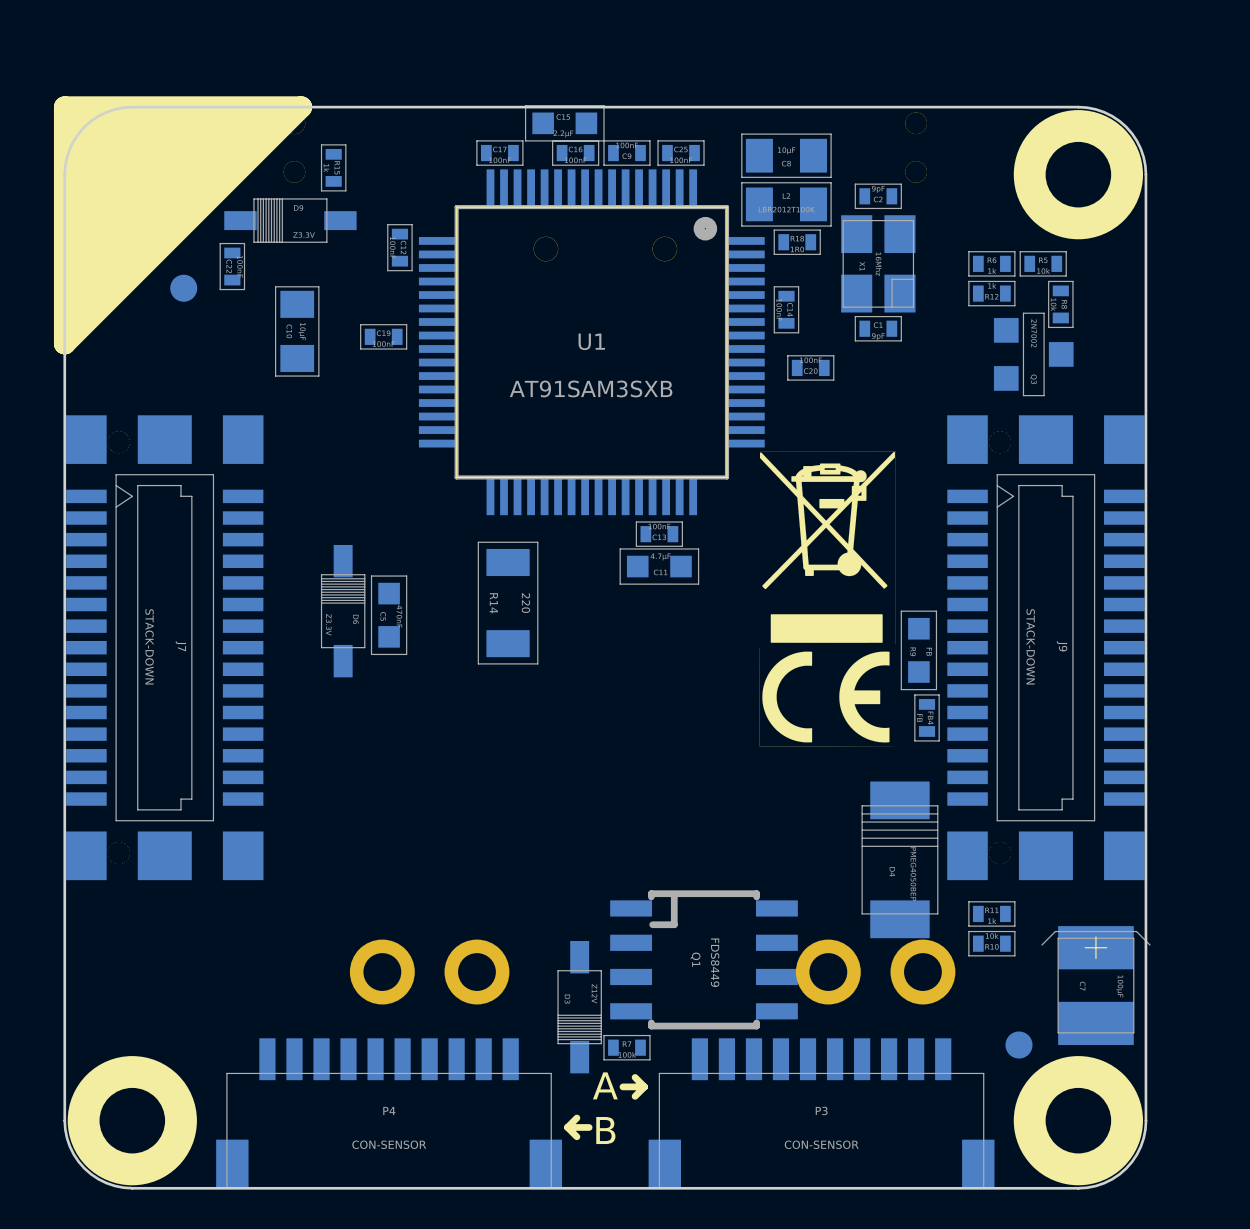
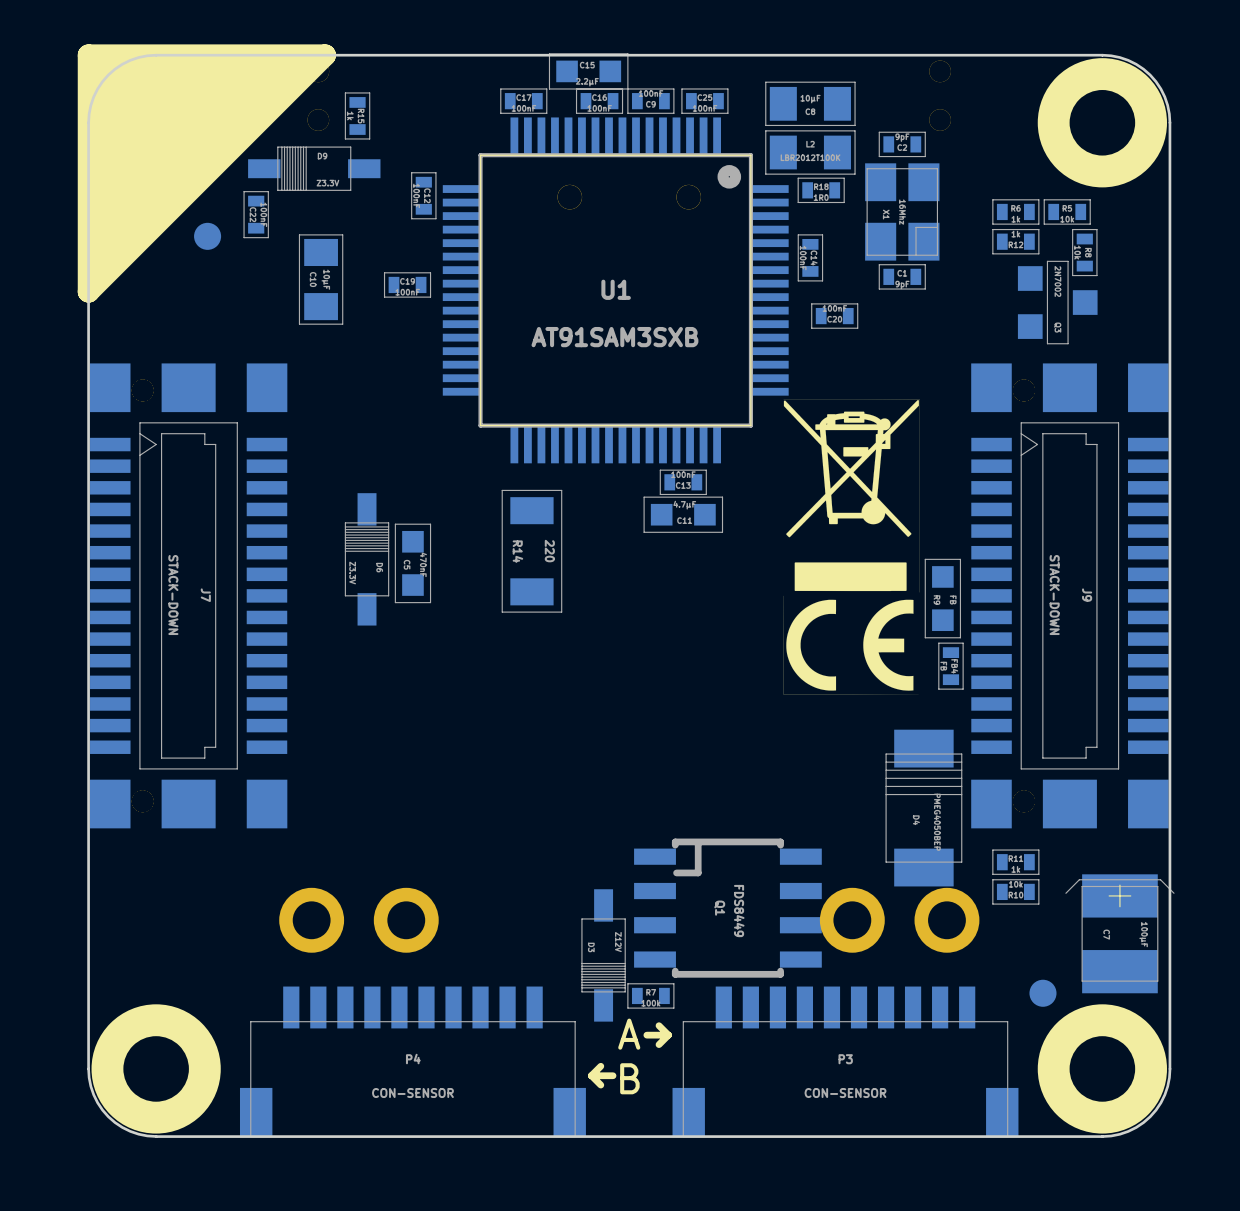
part position: (429, 972) -> (358, 920)

